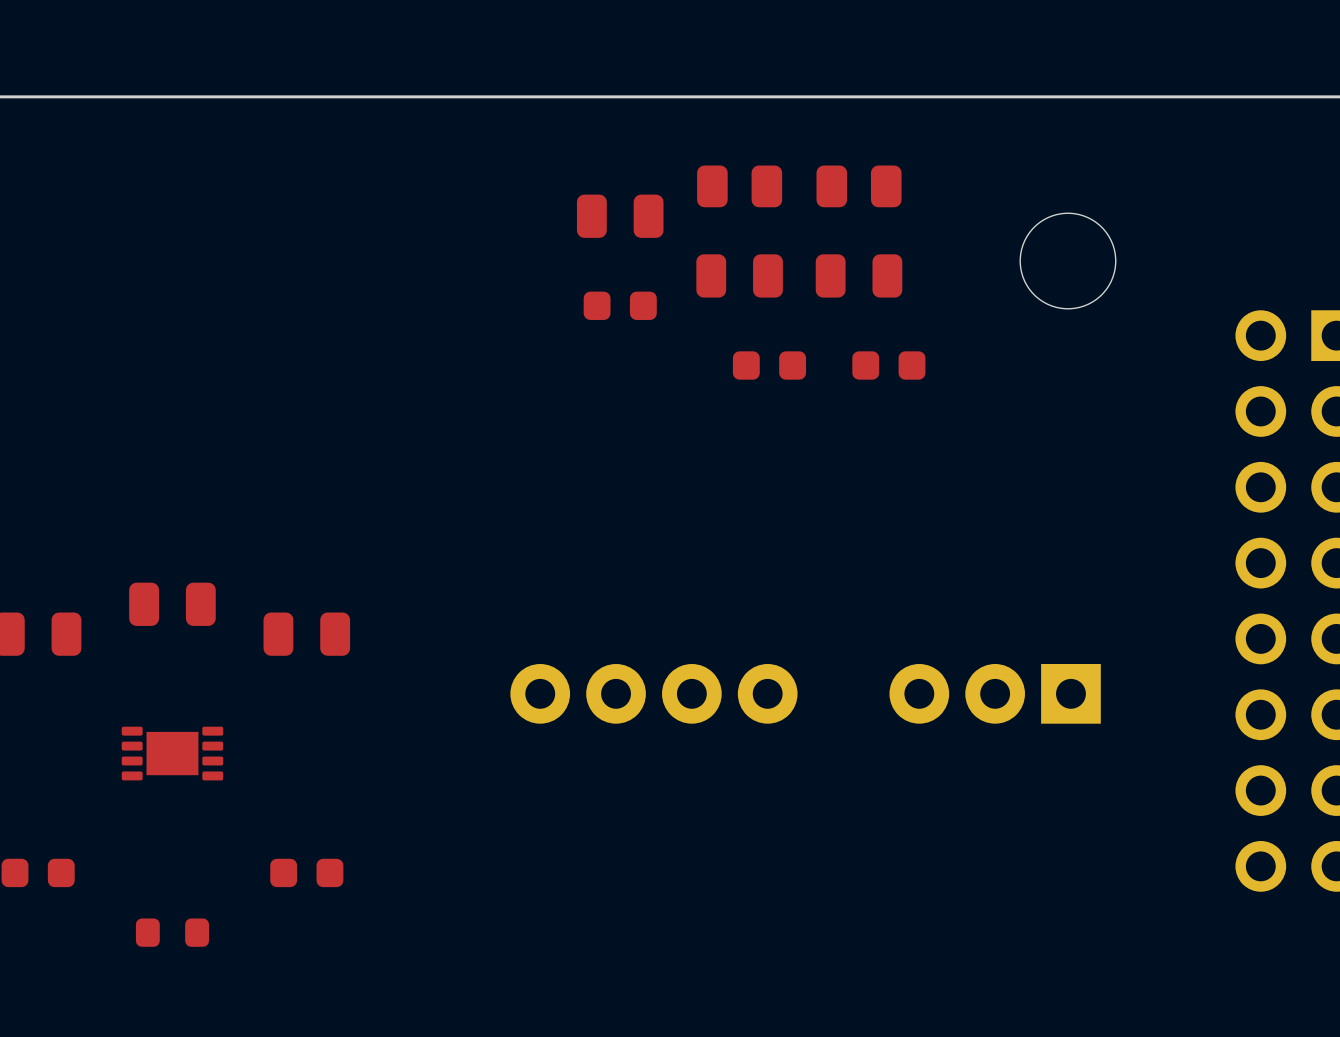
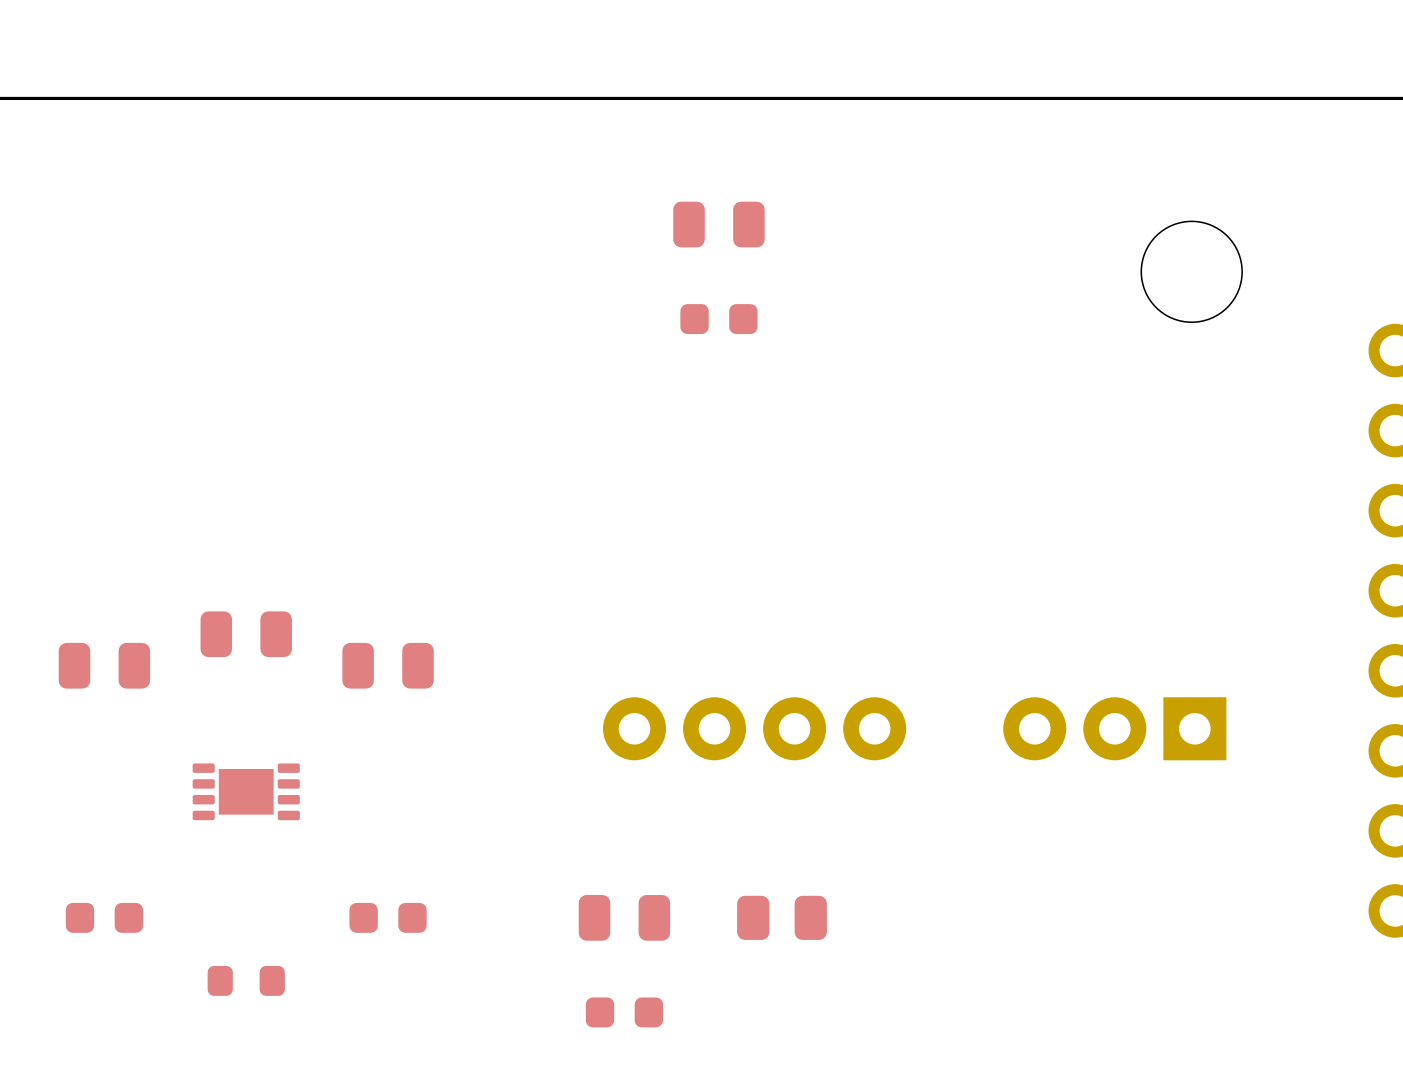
part: (739, 186) -> none
part: (859, 186) -> none
part: (739, 275) -> none
part: (859, 275) -> none
part: (769, 365) -> none
part: (888, 365) -> none
part: none -> (624, 917)
part: none -> (782, 917)
part: none -> (624, 1012)

